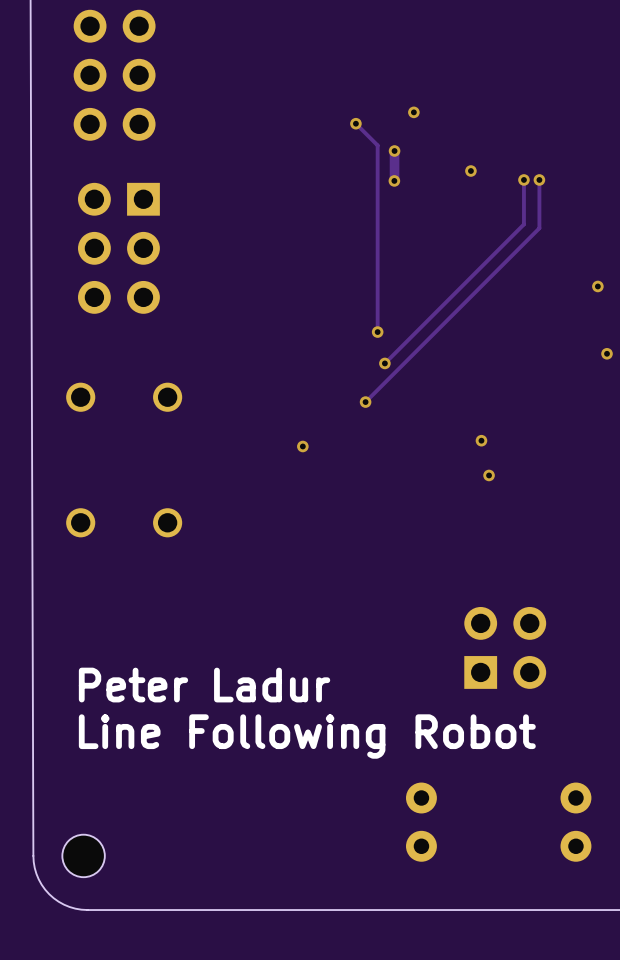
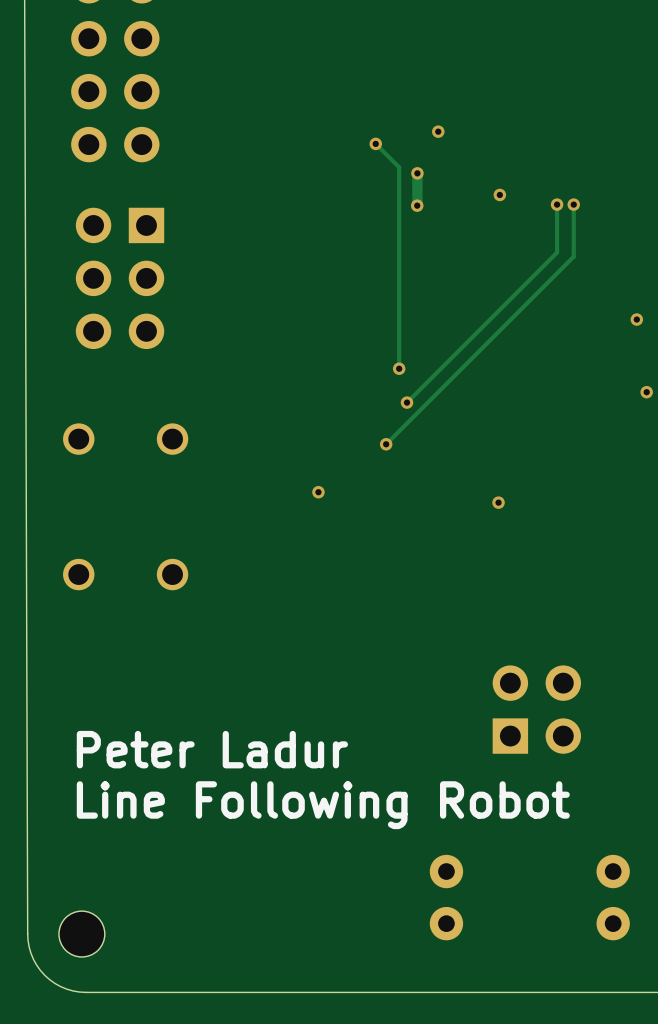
via: (481, 440) -> none
via: none -> (498, 502)
via: (489, 475) -> none

